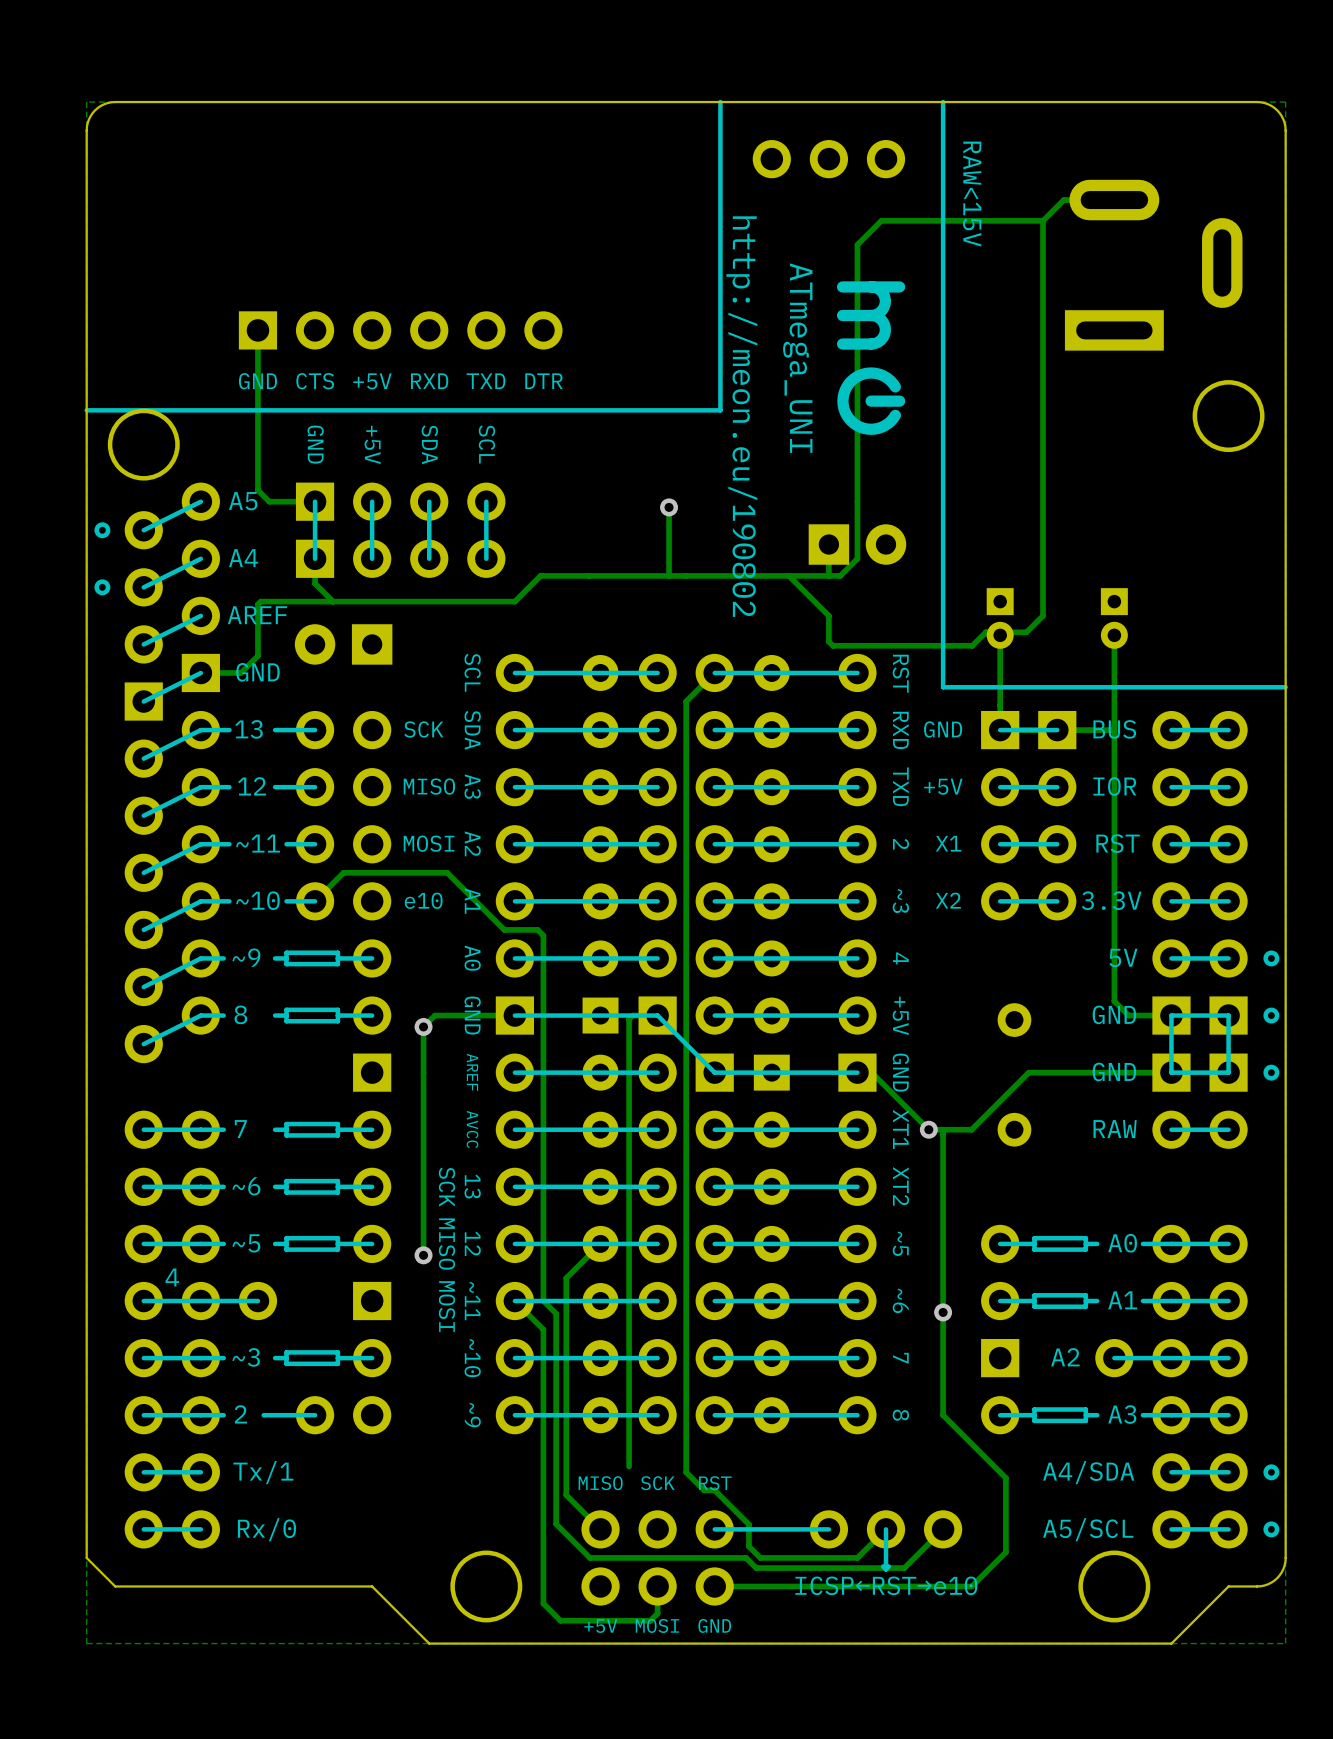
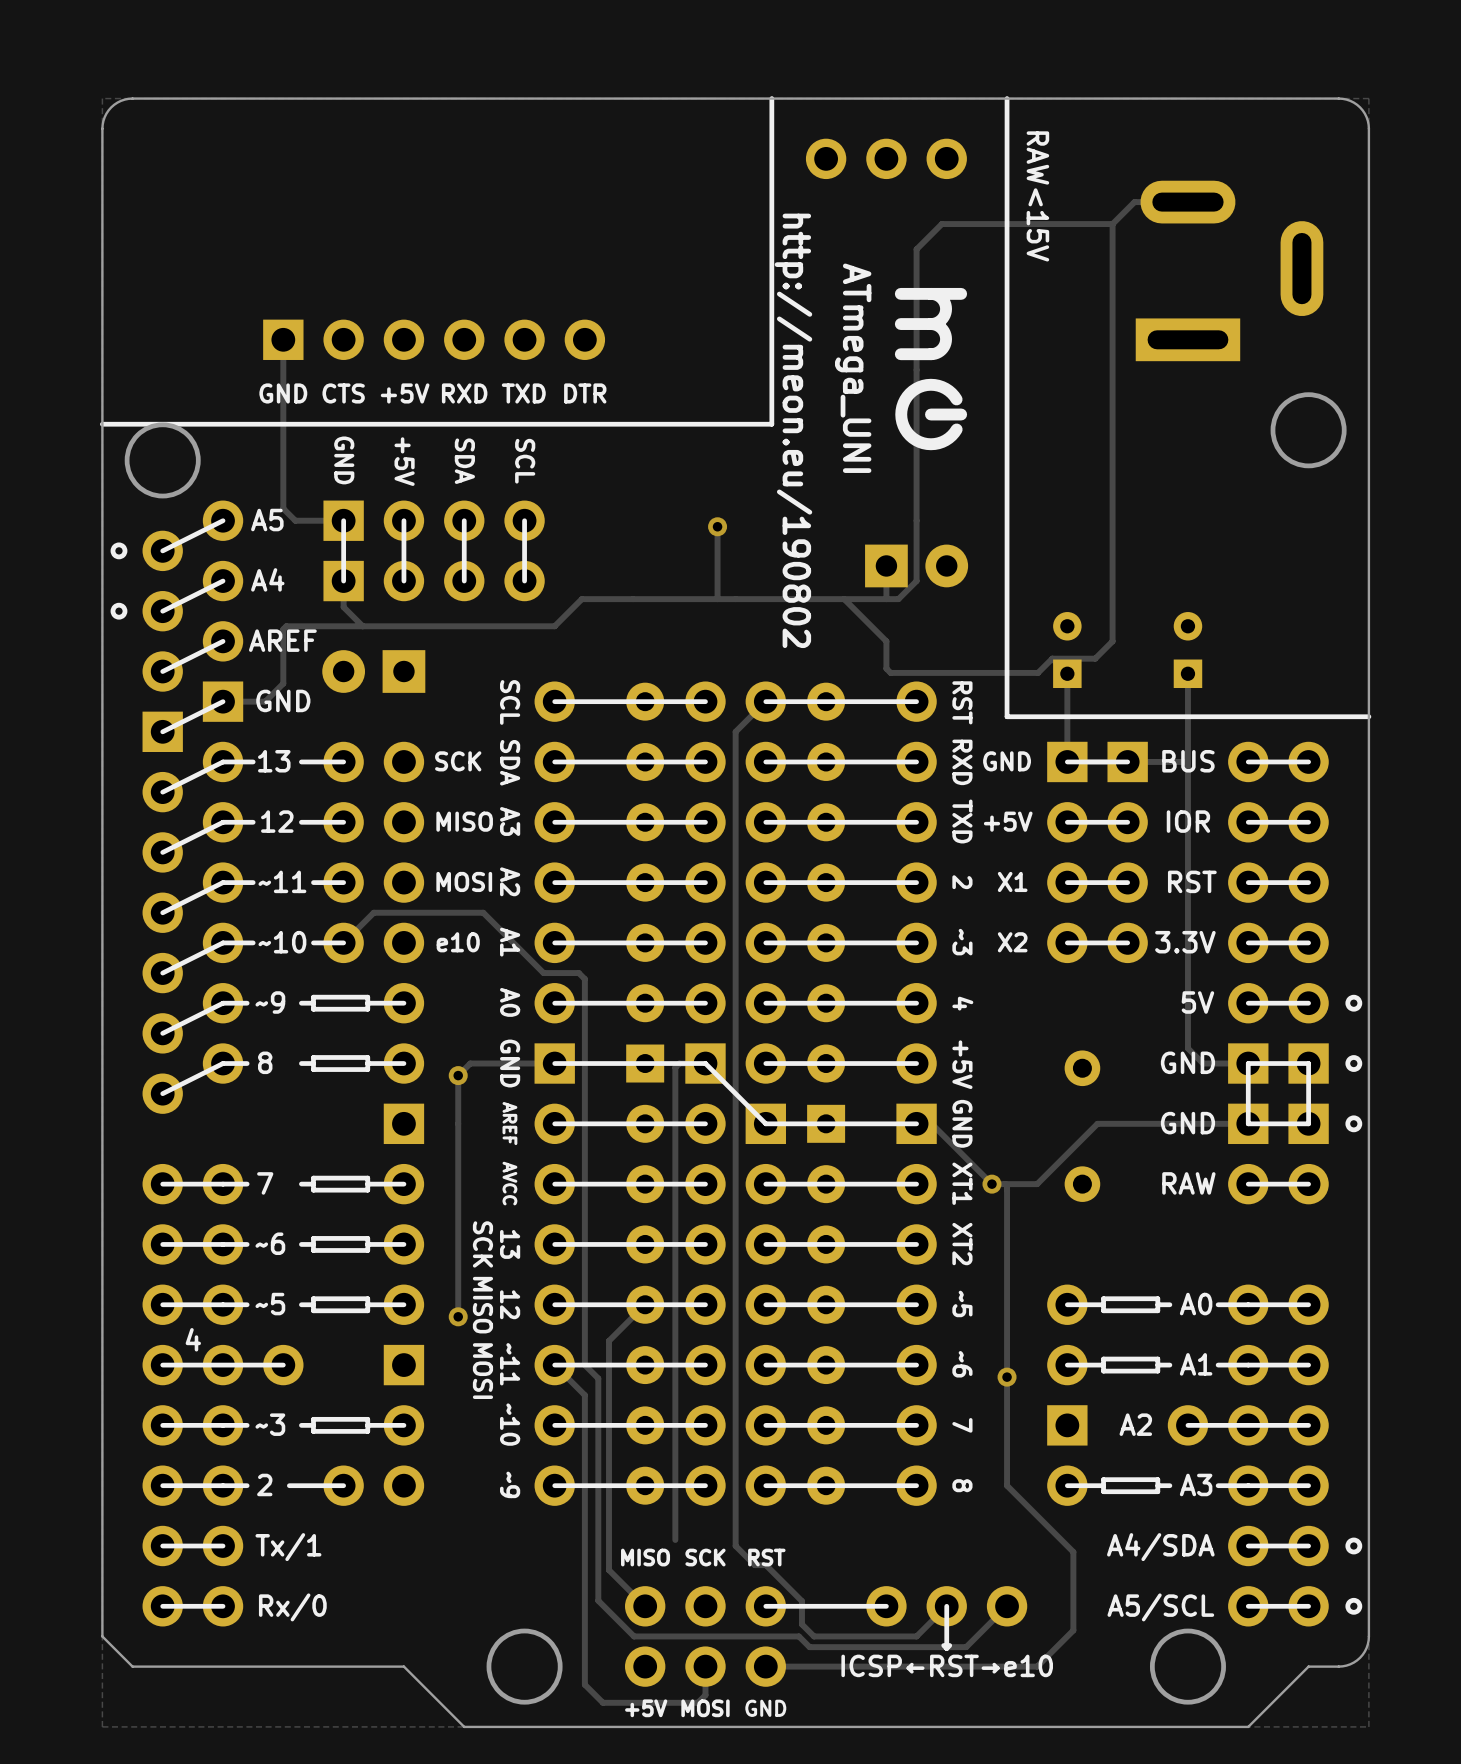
part footprint: [986, 588, 1014, 649] -> [1053, 612, 1082, 689]
part footprint: [1100, 588, 1128, 649] -> [1173, 612, 1203, 689]

